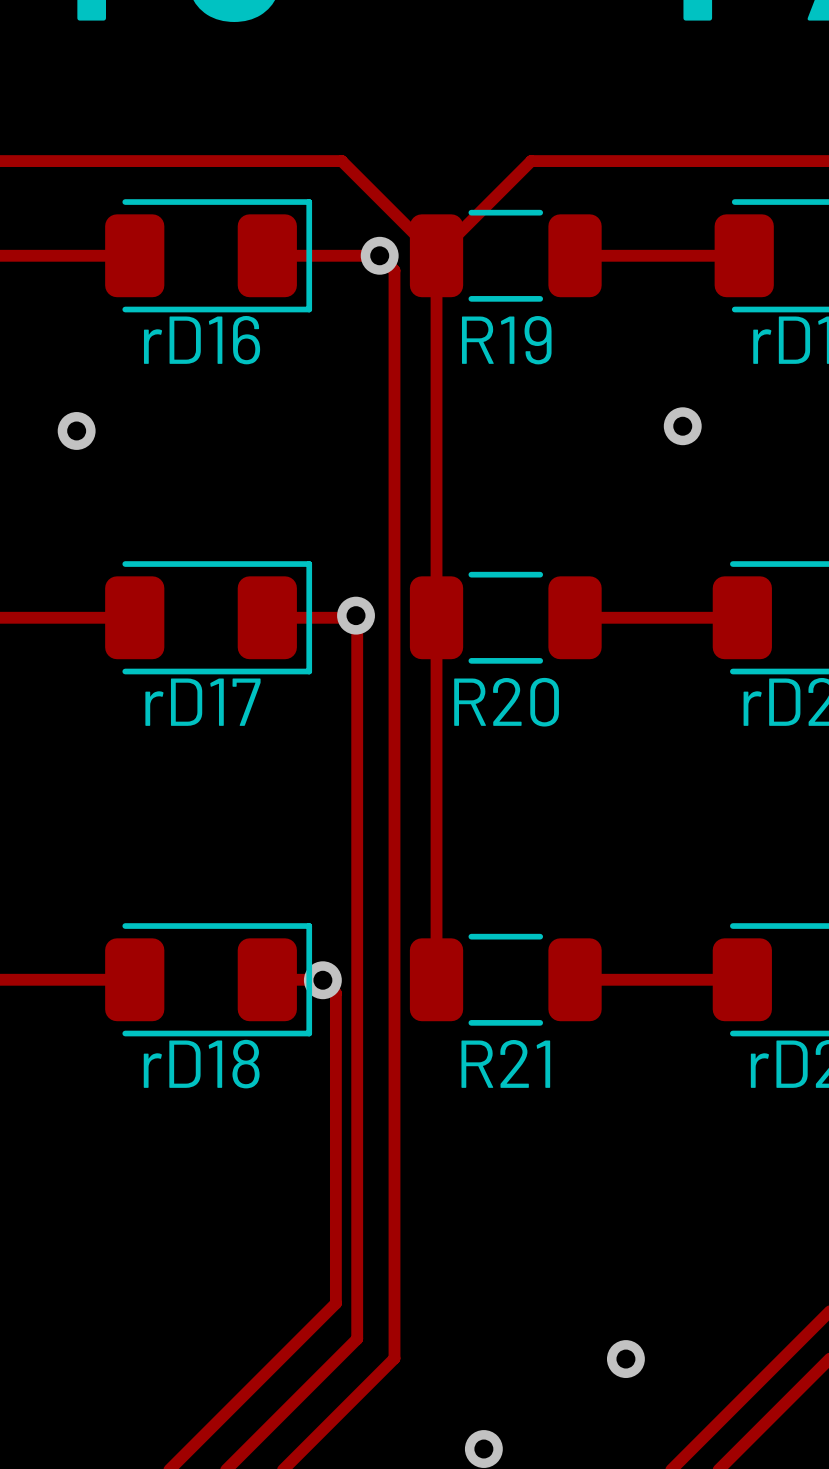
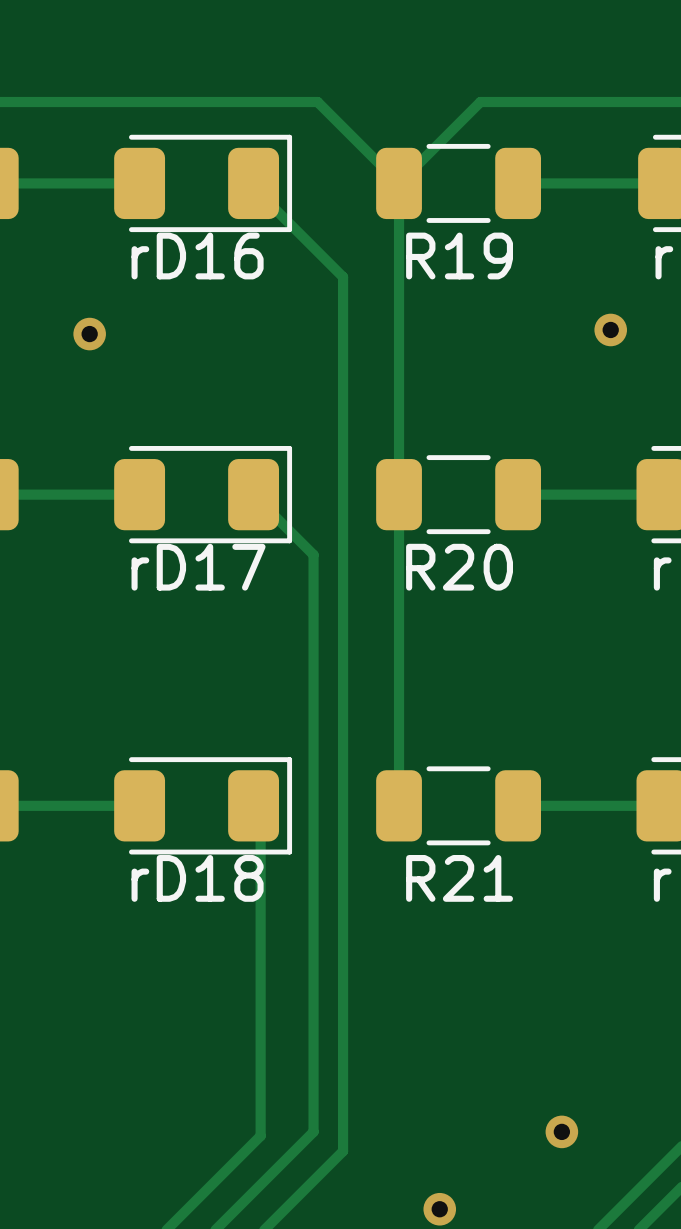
track: (267, 255) (379, 255) (394, 270) (394, 1358) (371, 1381) -> (253, 183) (253, 187) (343, 277) (343, 1151)
via: (379, 255) -> none
via: (356, 615) -> none
track: (267, 617) (357, 616) (357, 1338) (337, 1359) -> (253, 494) (313, 554) (313, 1131)
track: (267, 979) (322, 979) (335, 993) (335, 1303) (275, 1363) -> (260, 821) (260, 1135)
via: (322, 980) -> none

